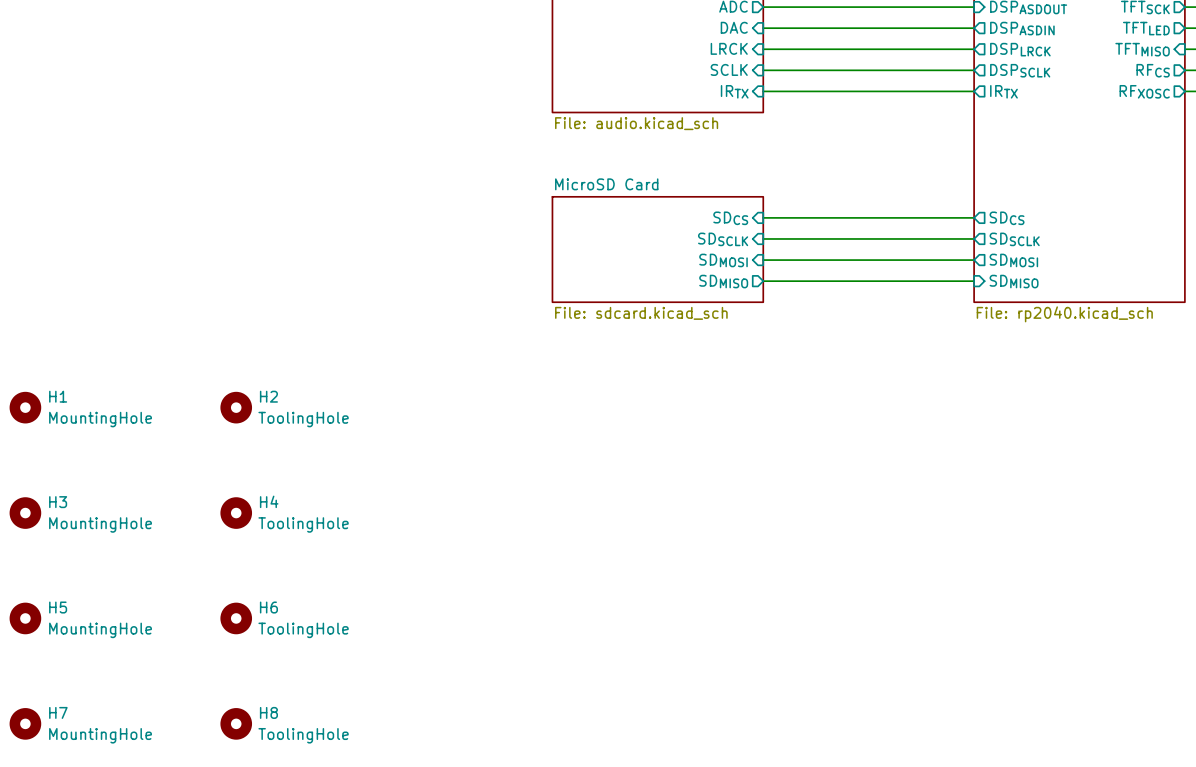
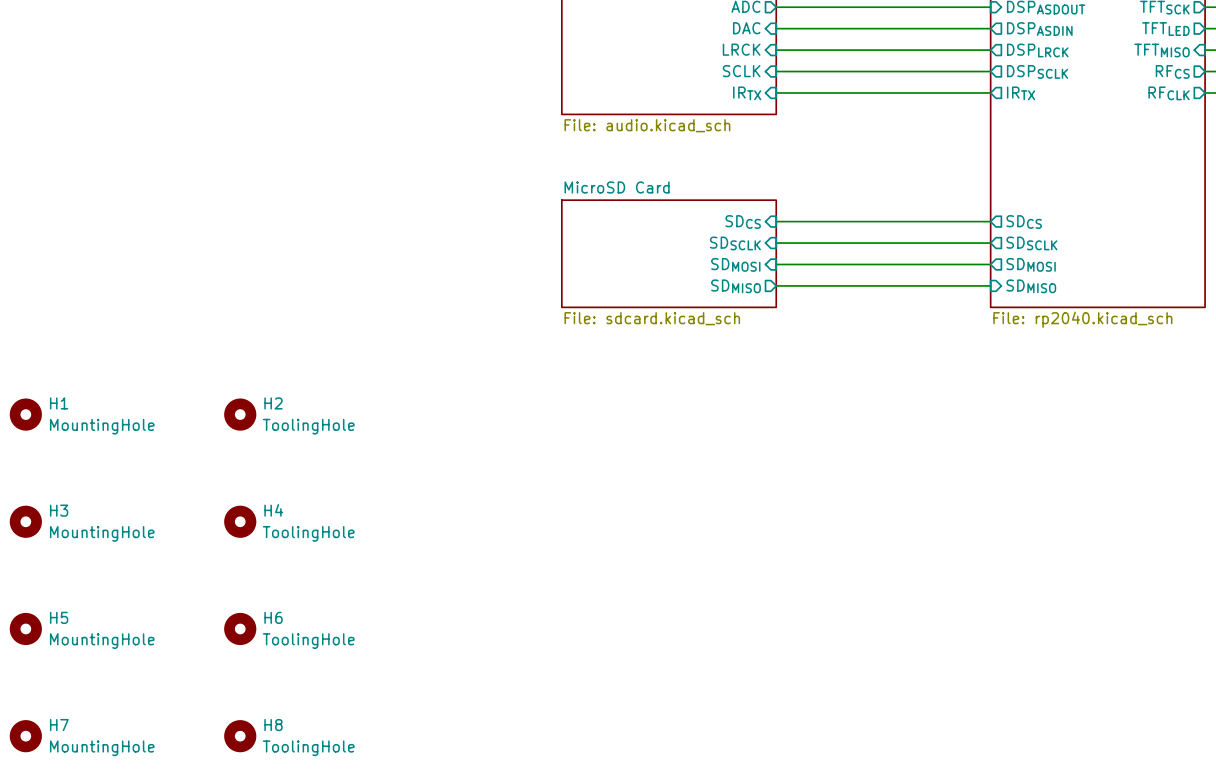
sheet pin: RFXOSC (1144, 91) -> RFCLK (1169, 93)

